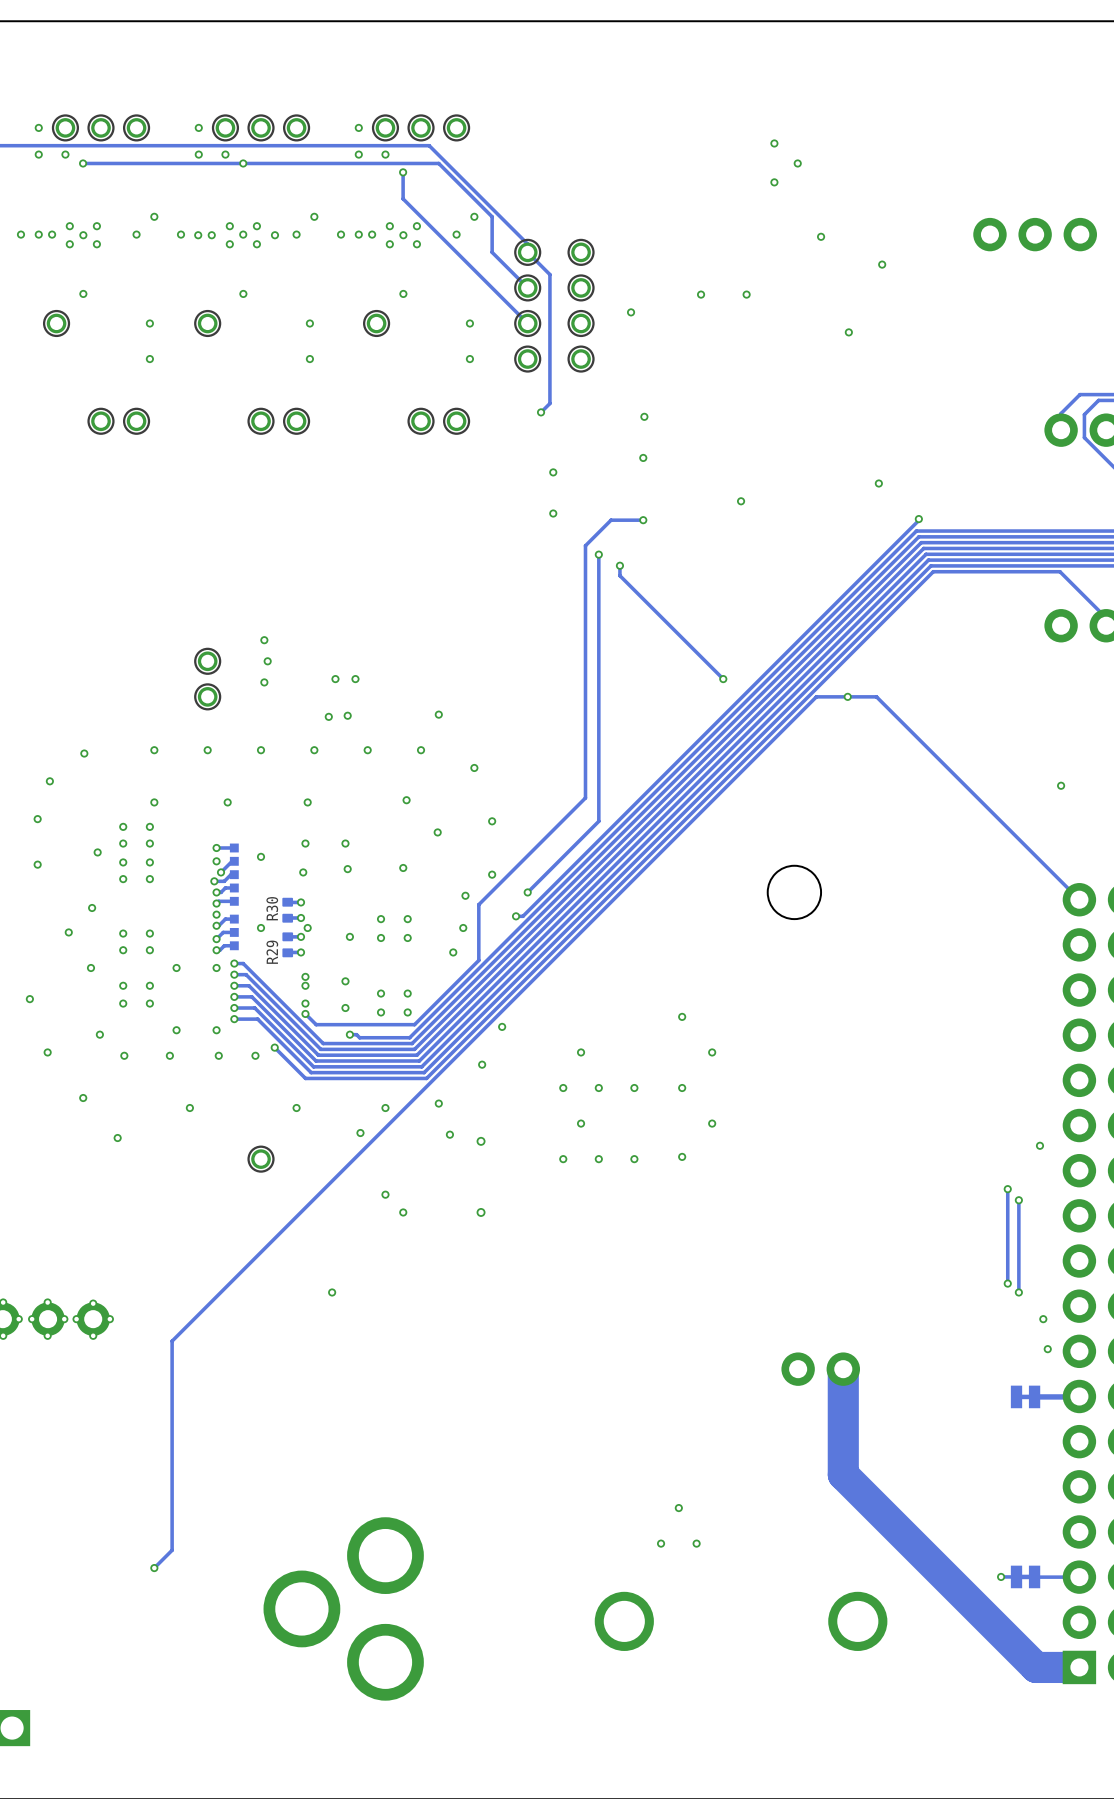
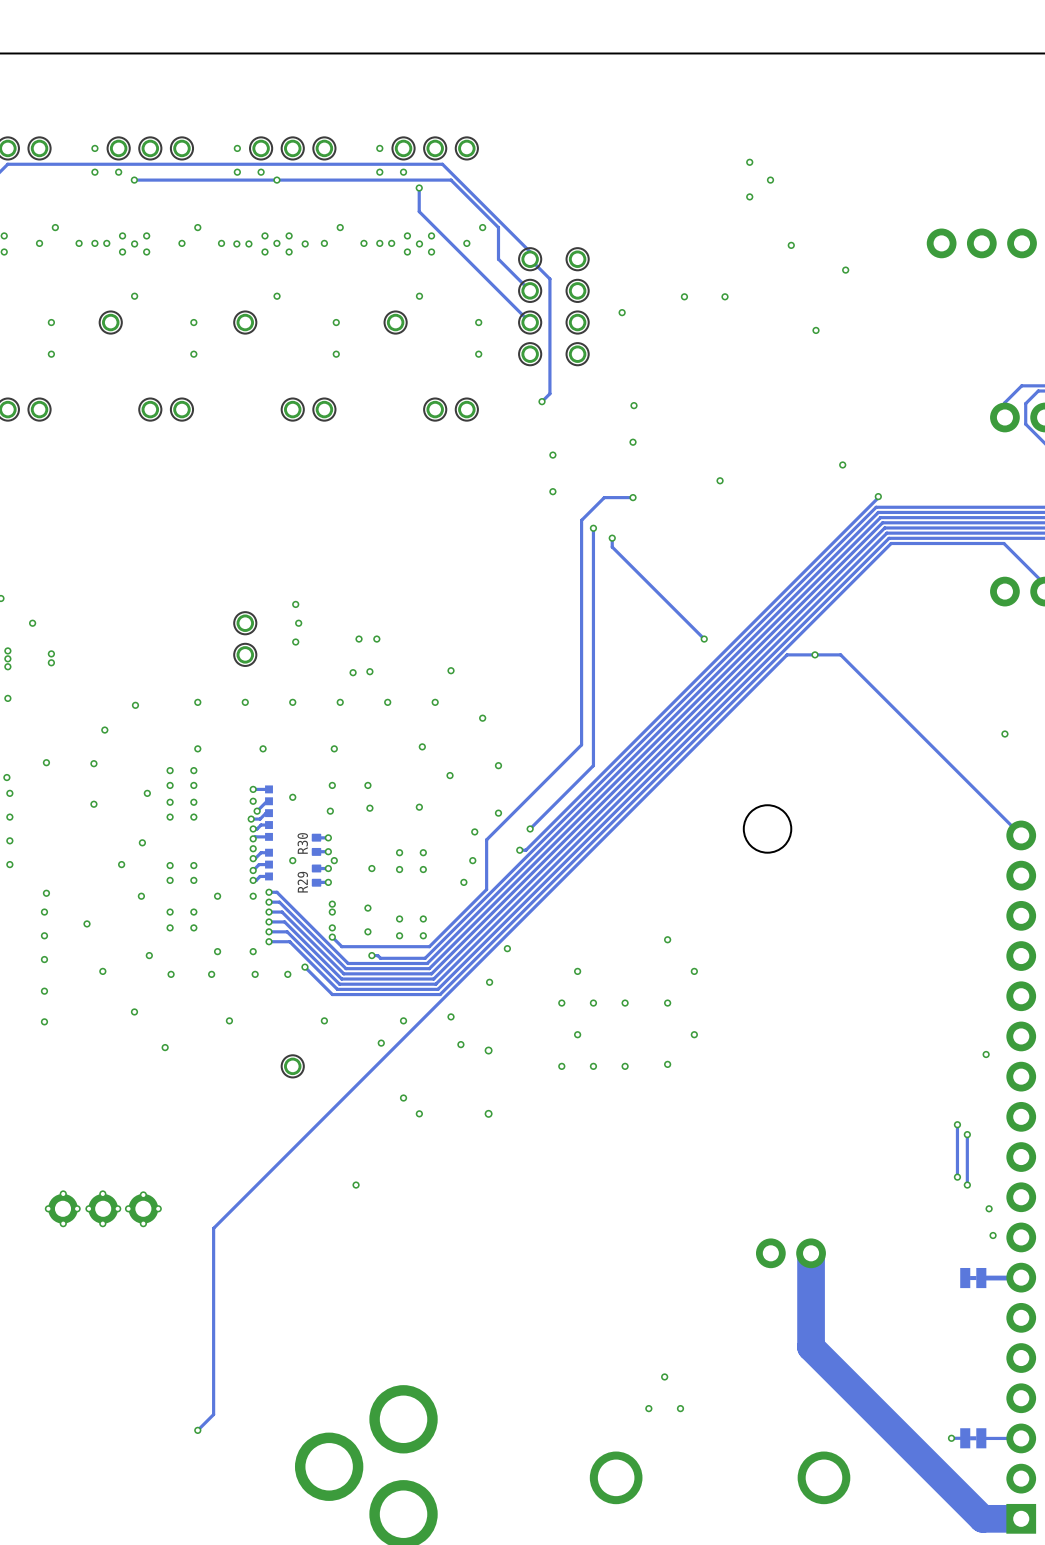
track: (1007, 1189) (1007, 1224) -> none
via: (1007, 1189) -> none
track: (1018, 1200) (1018, 1235) -> none
via: (1018, 1200) -> none
via: none -> (957, 1124)
via: none -> (967, 1134)

